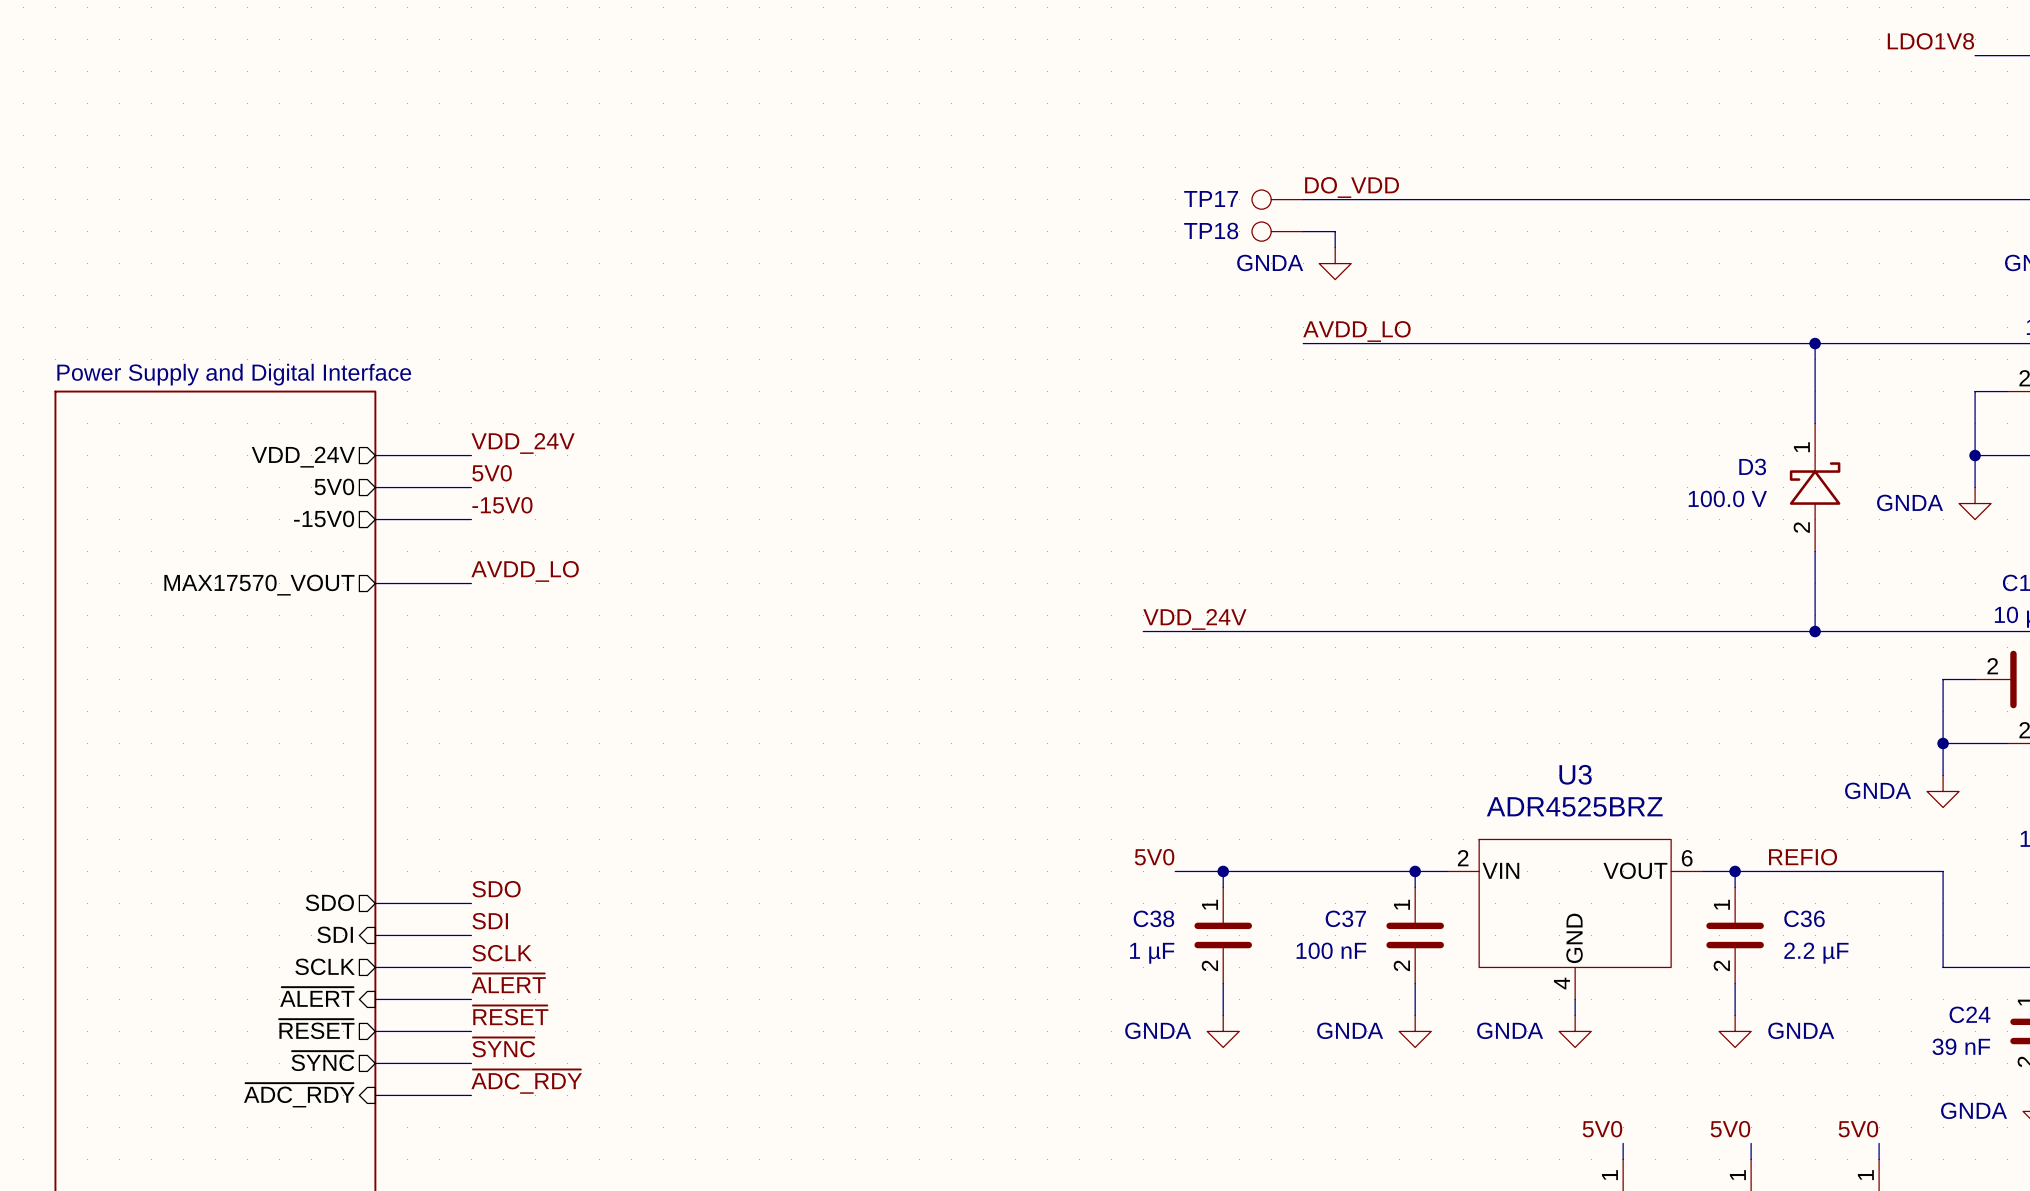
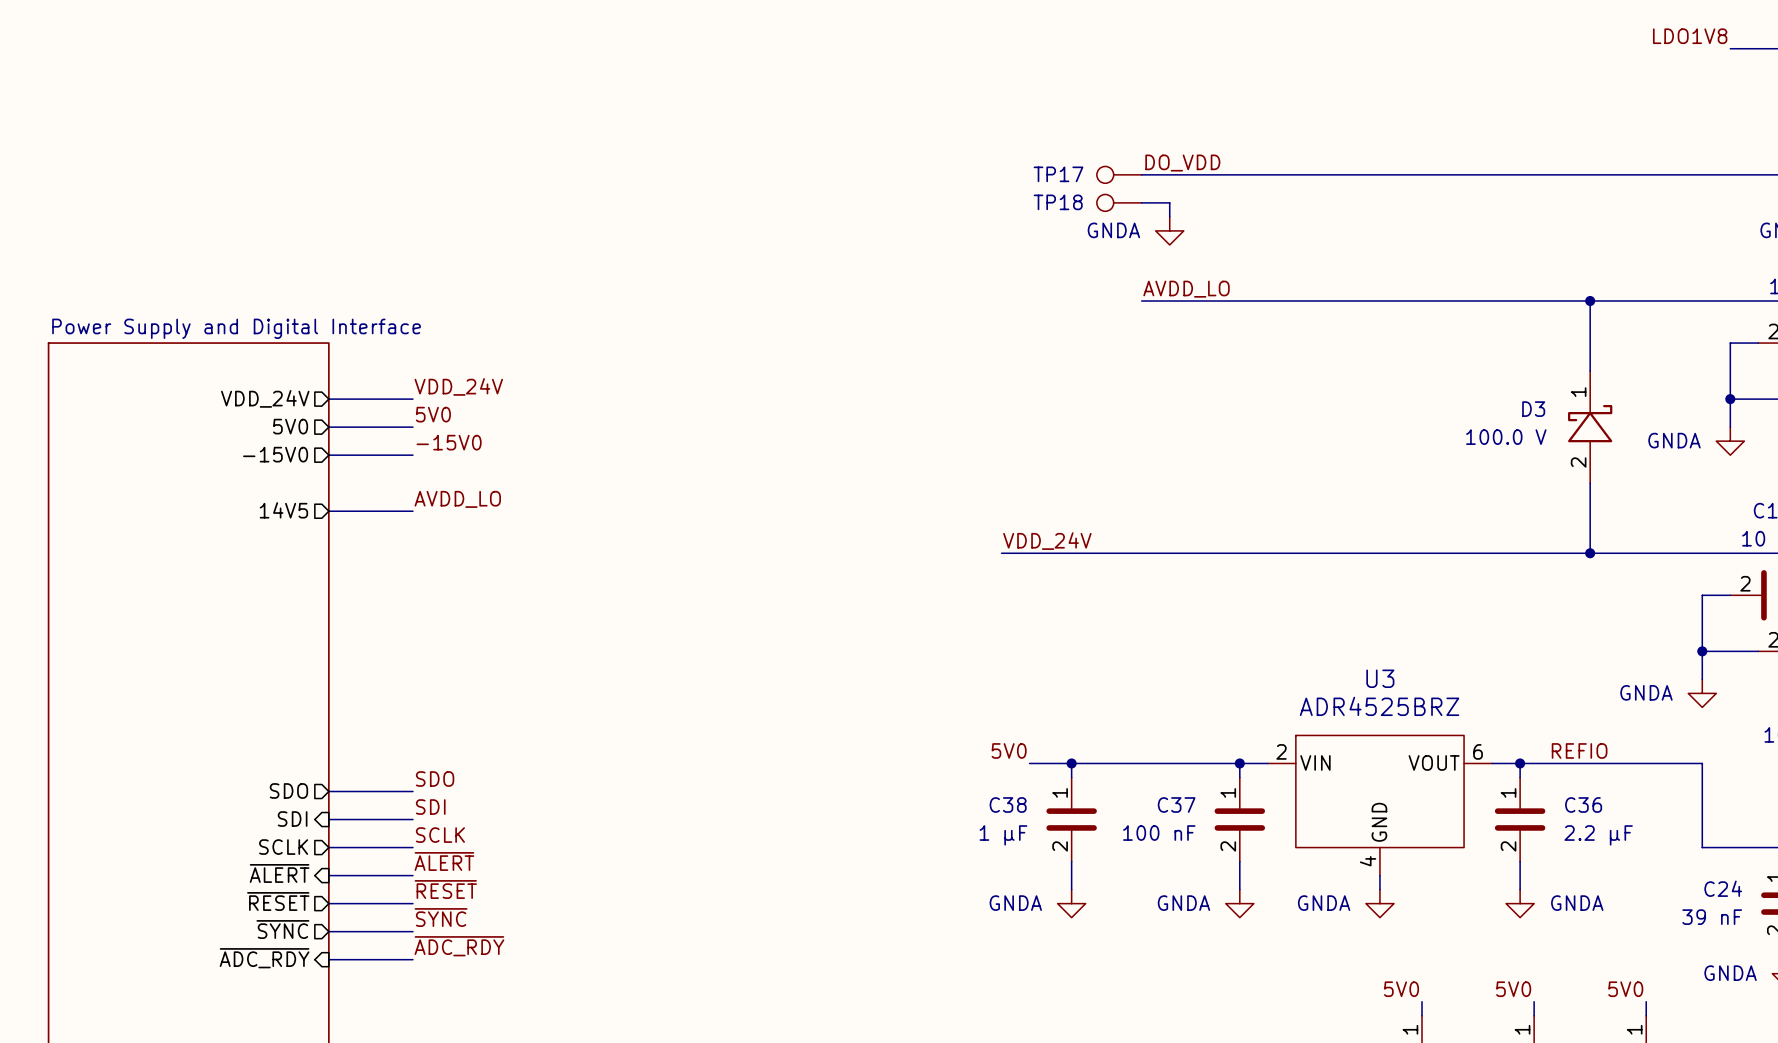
sheet pin: MAX17570_VOUT (259, 585) -> 14V5 (283, 510)

